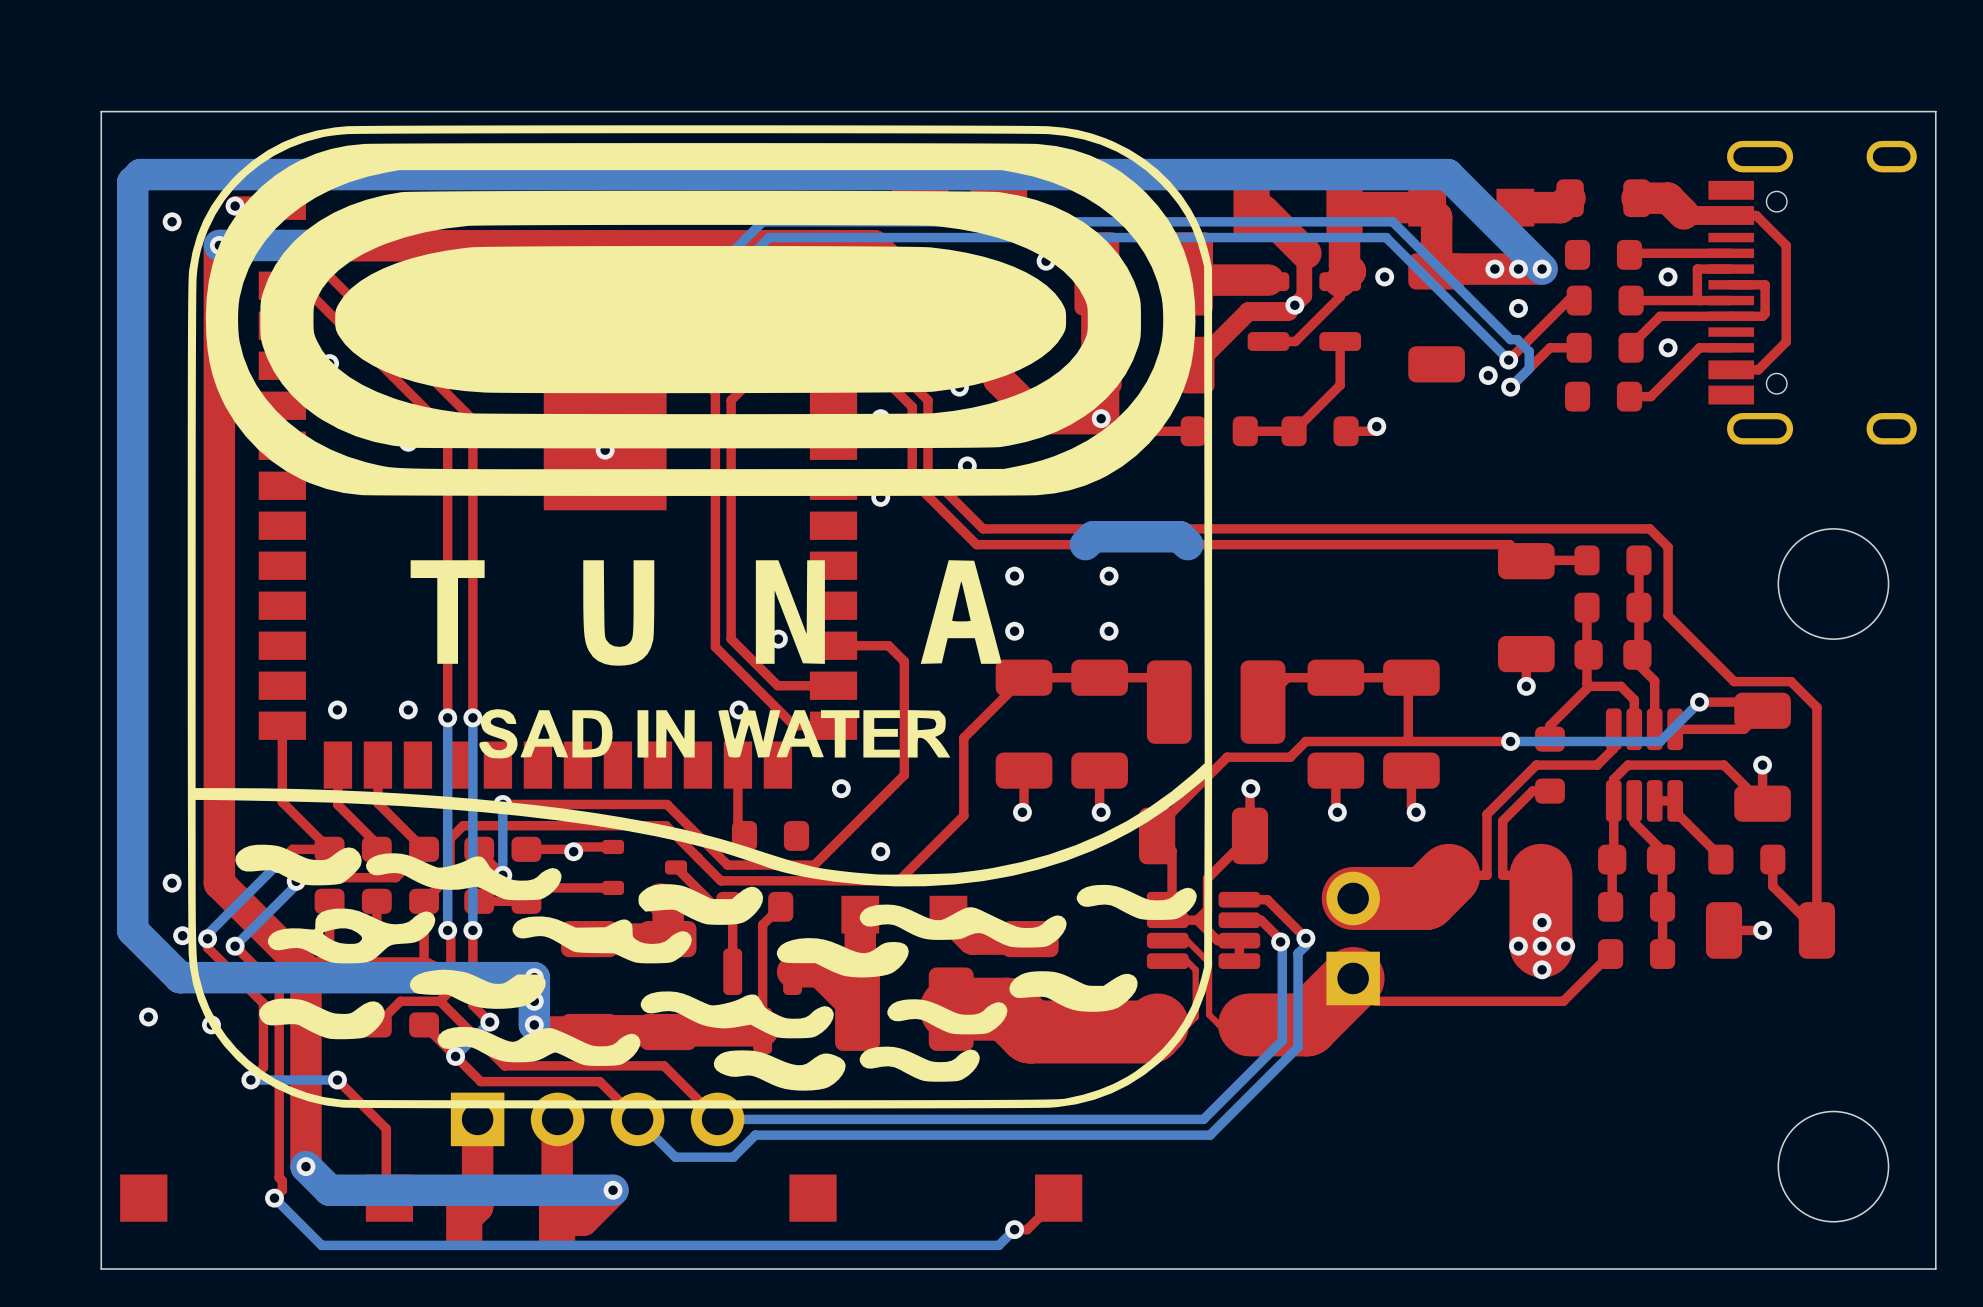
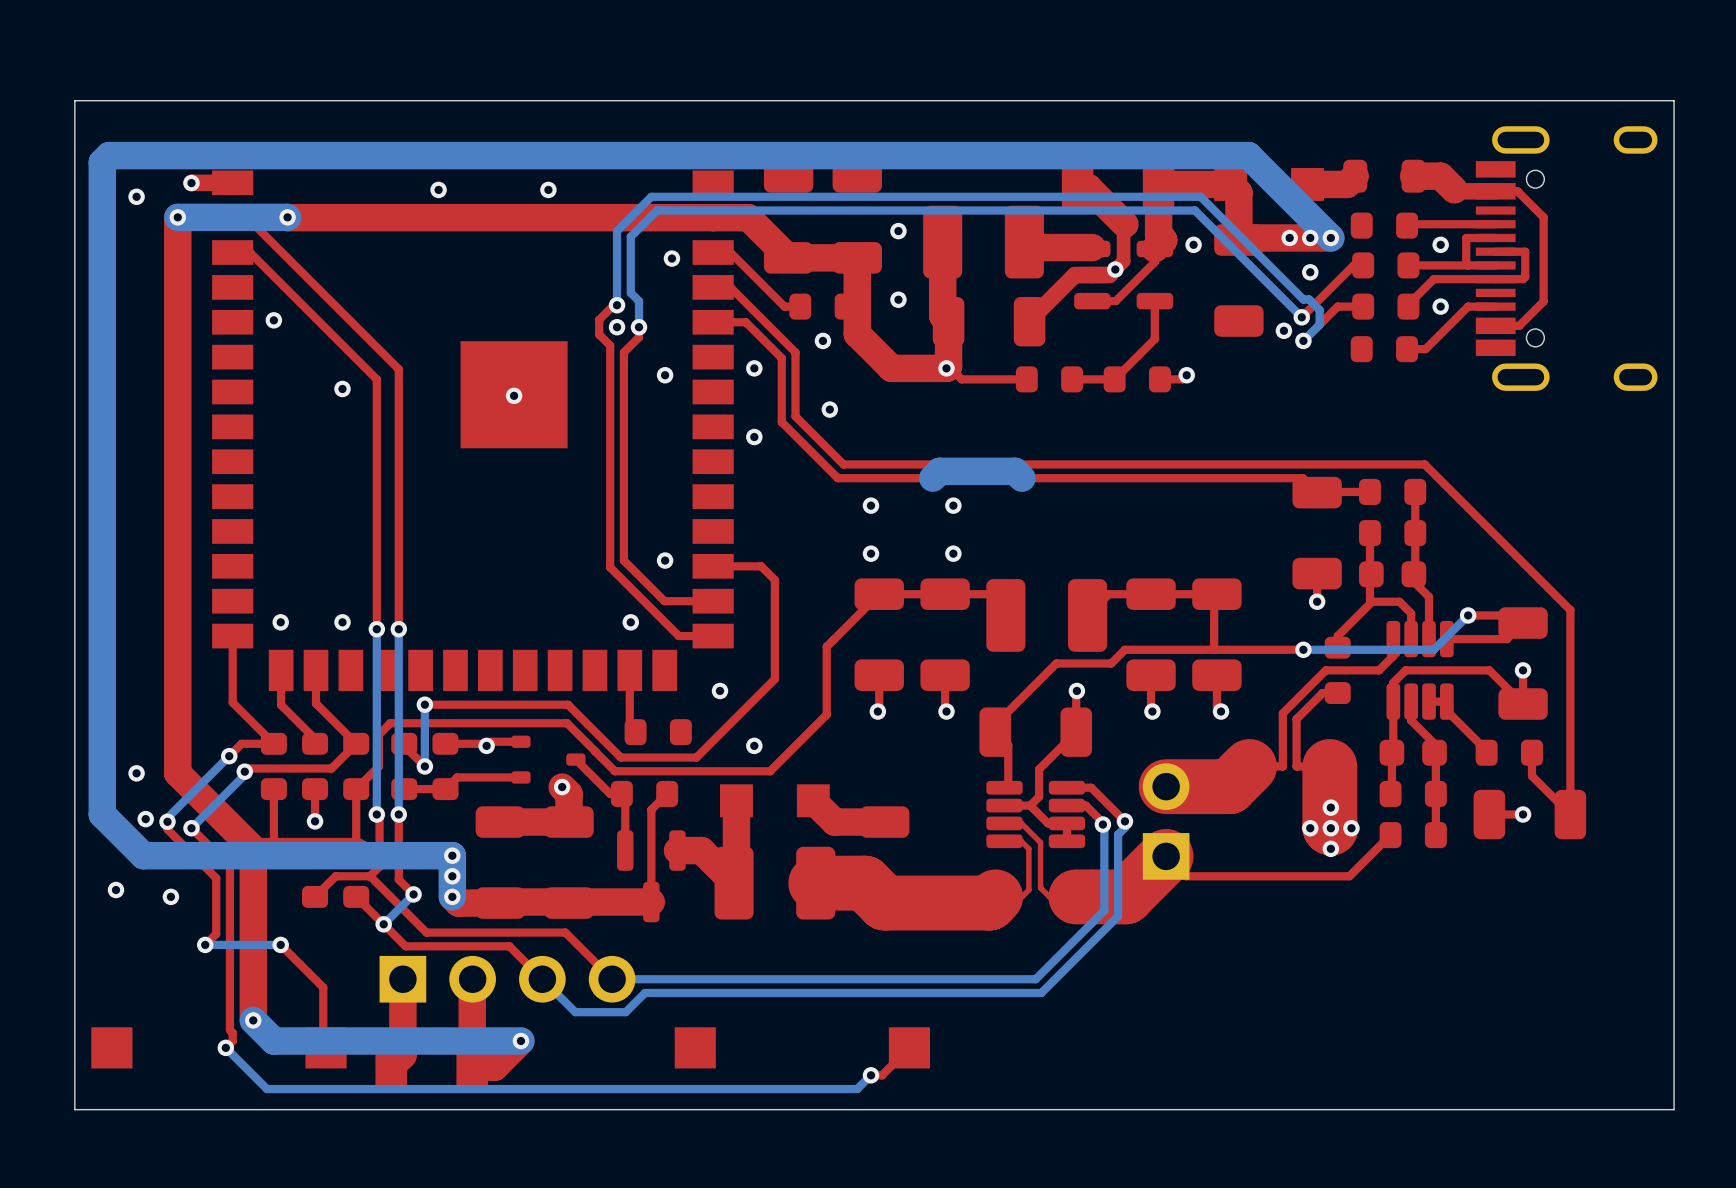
drawing: [187, 125, 1213, 1109] -> none
round board edge: [1777, 528, 1890, 640] -> none
top track: (1668, 547) (1668, 615) (1734, 681) (1791, 681) (1816, 707) -> (1440, 480) (1570, 610) (1570, 620)
round board edge: [1777, 1110, 1890, 1223] -> none

